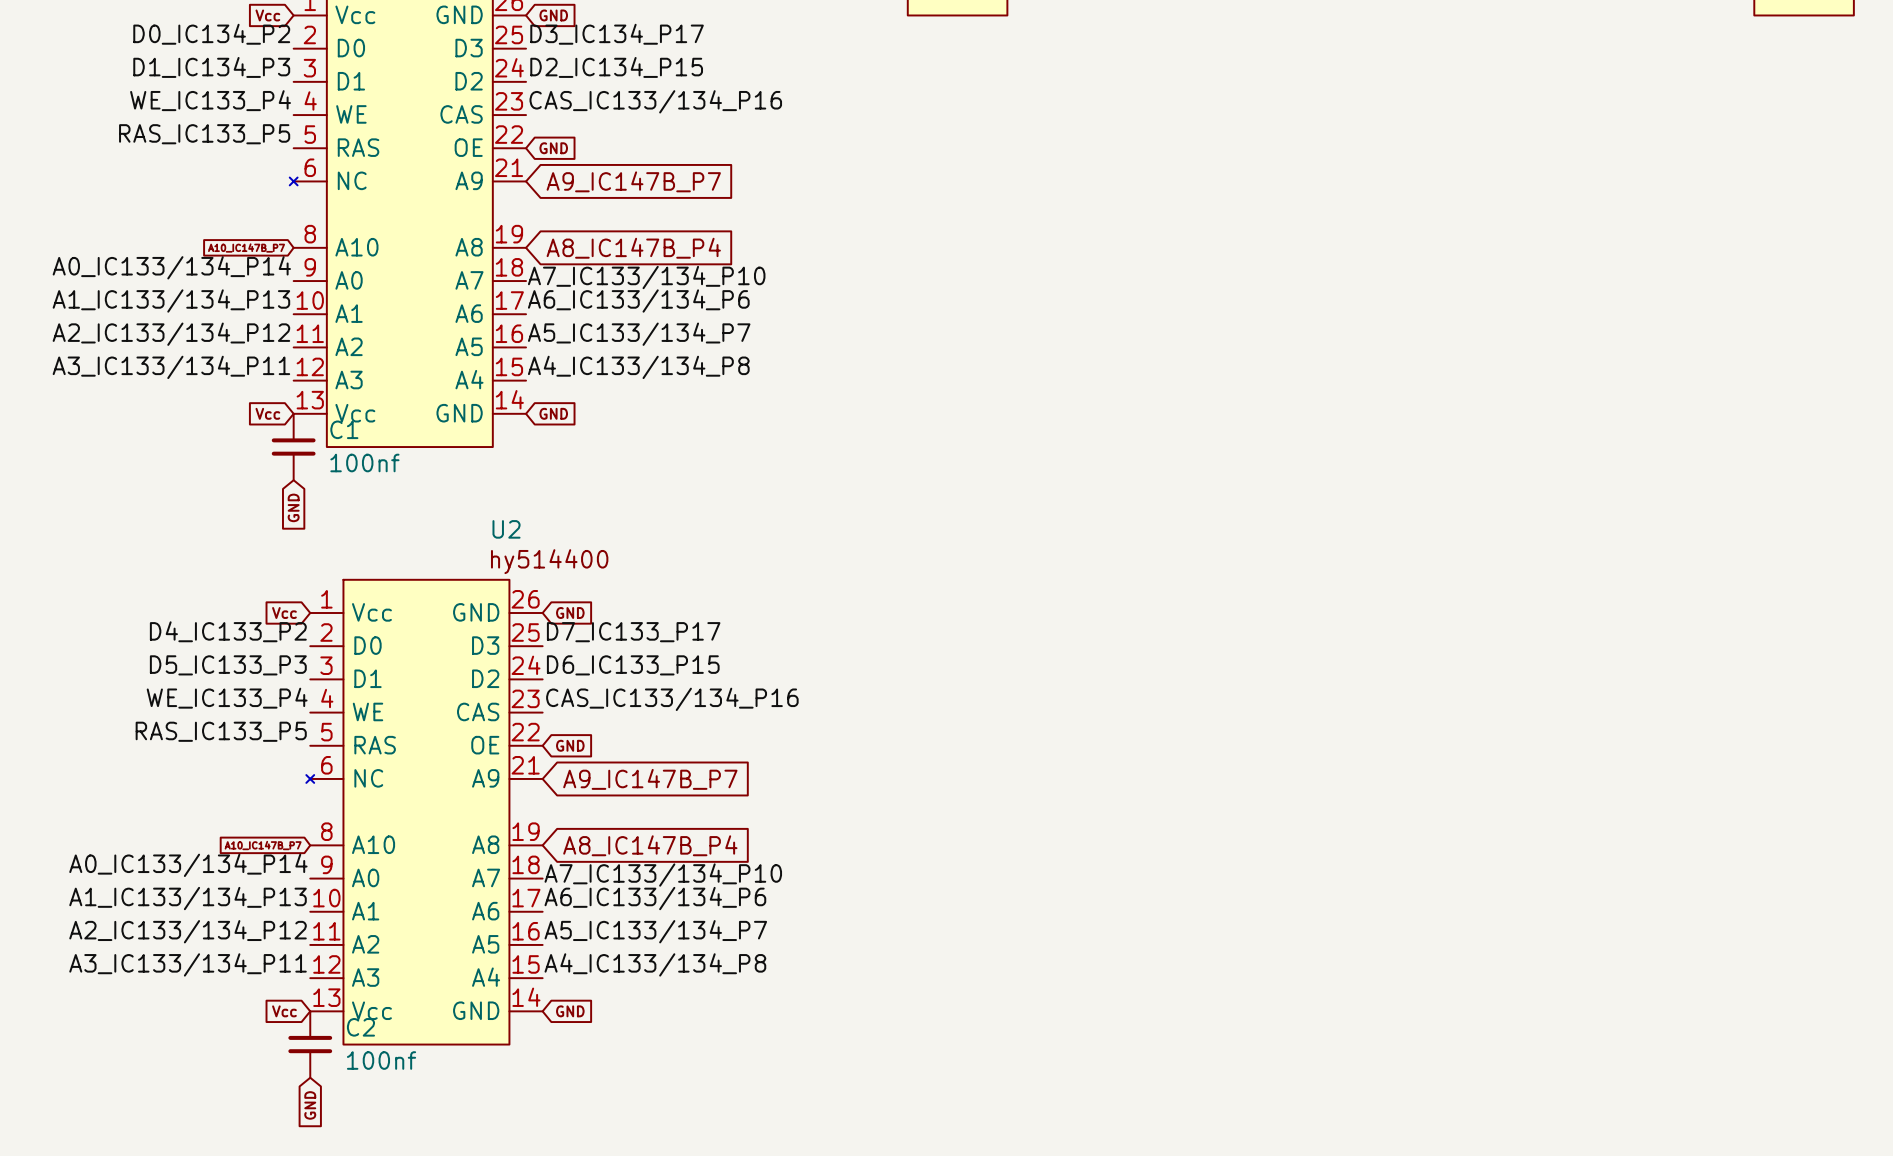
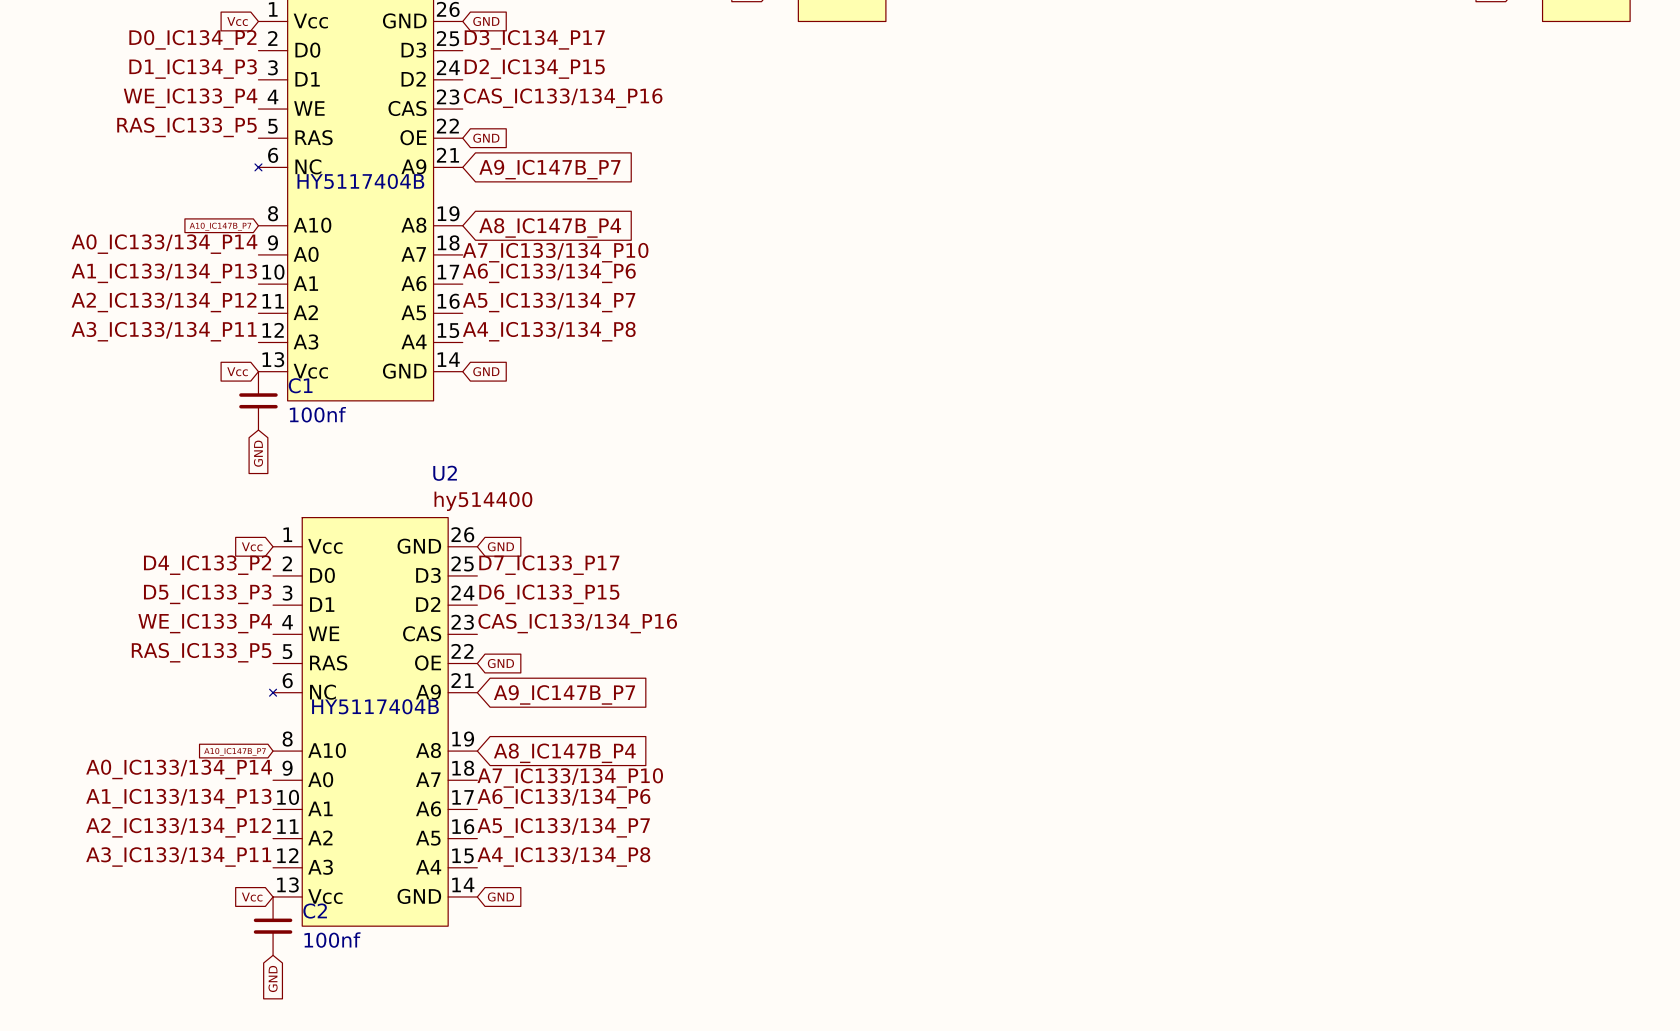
part value: none -> HY5117404B (360, 181)
U2 value: none -> HY5117404B (375, 706)

